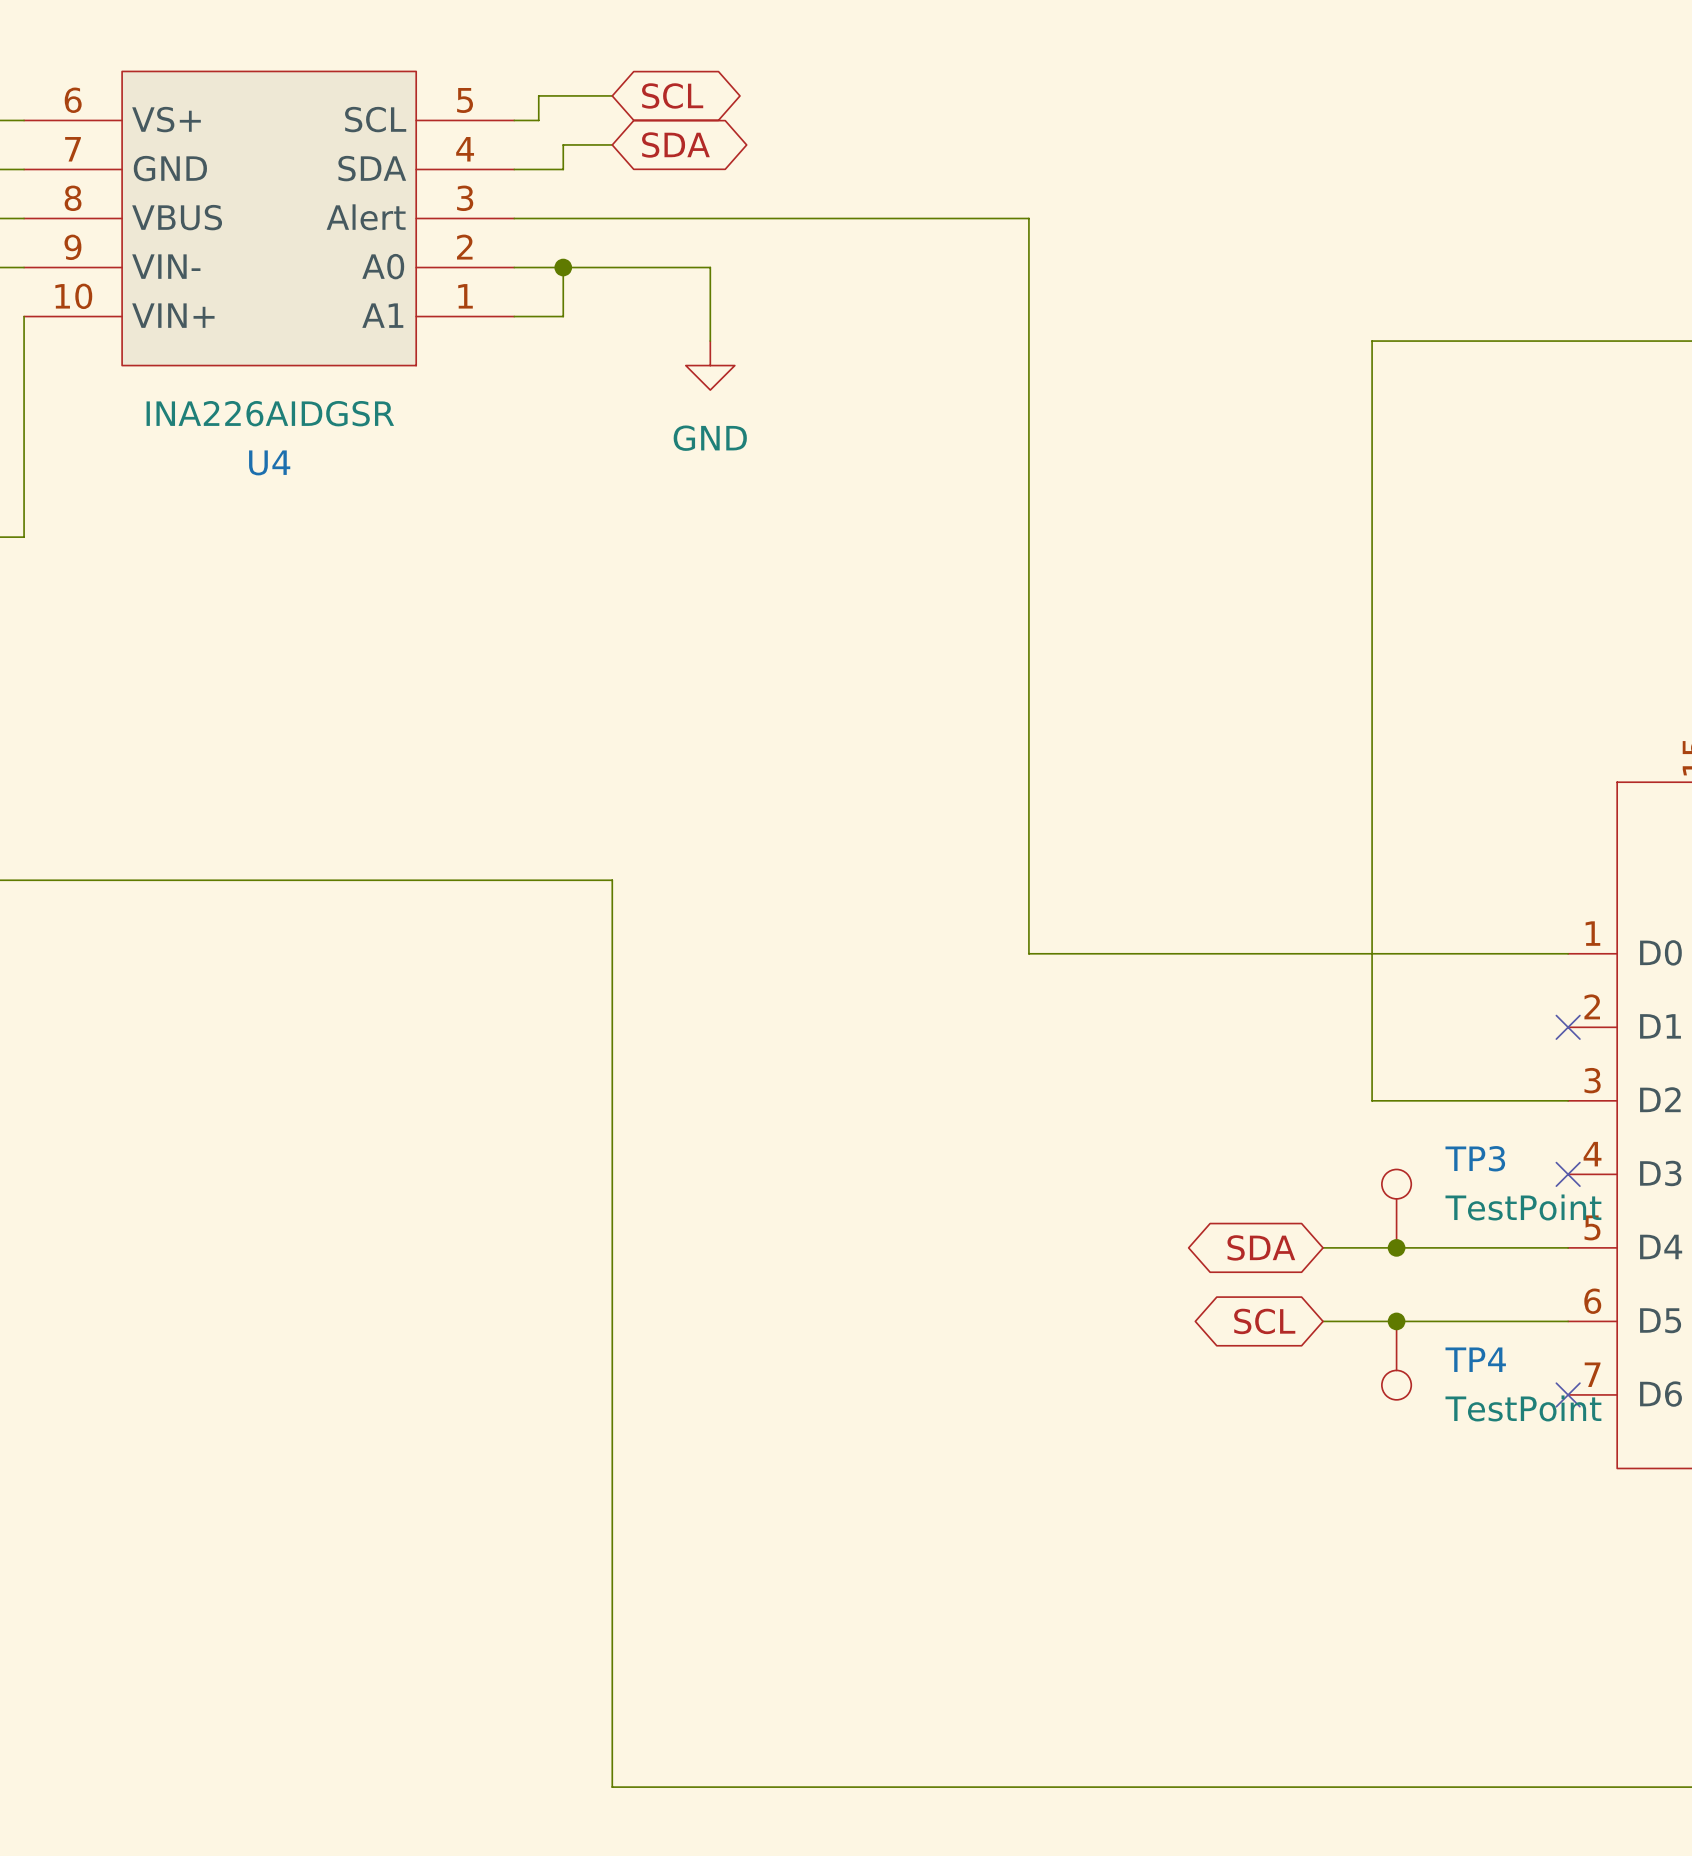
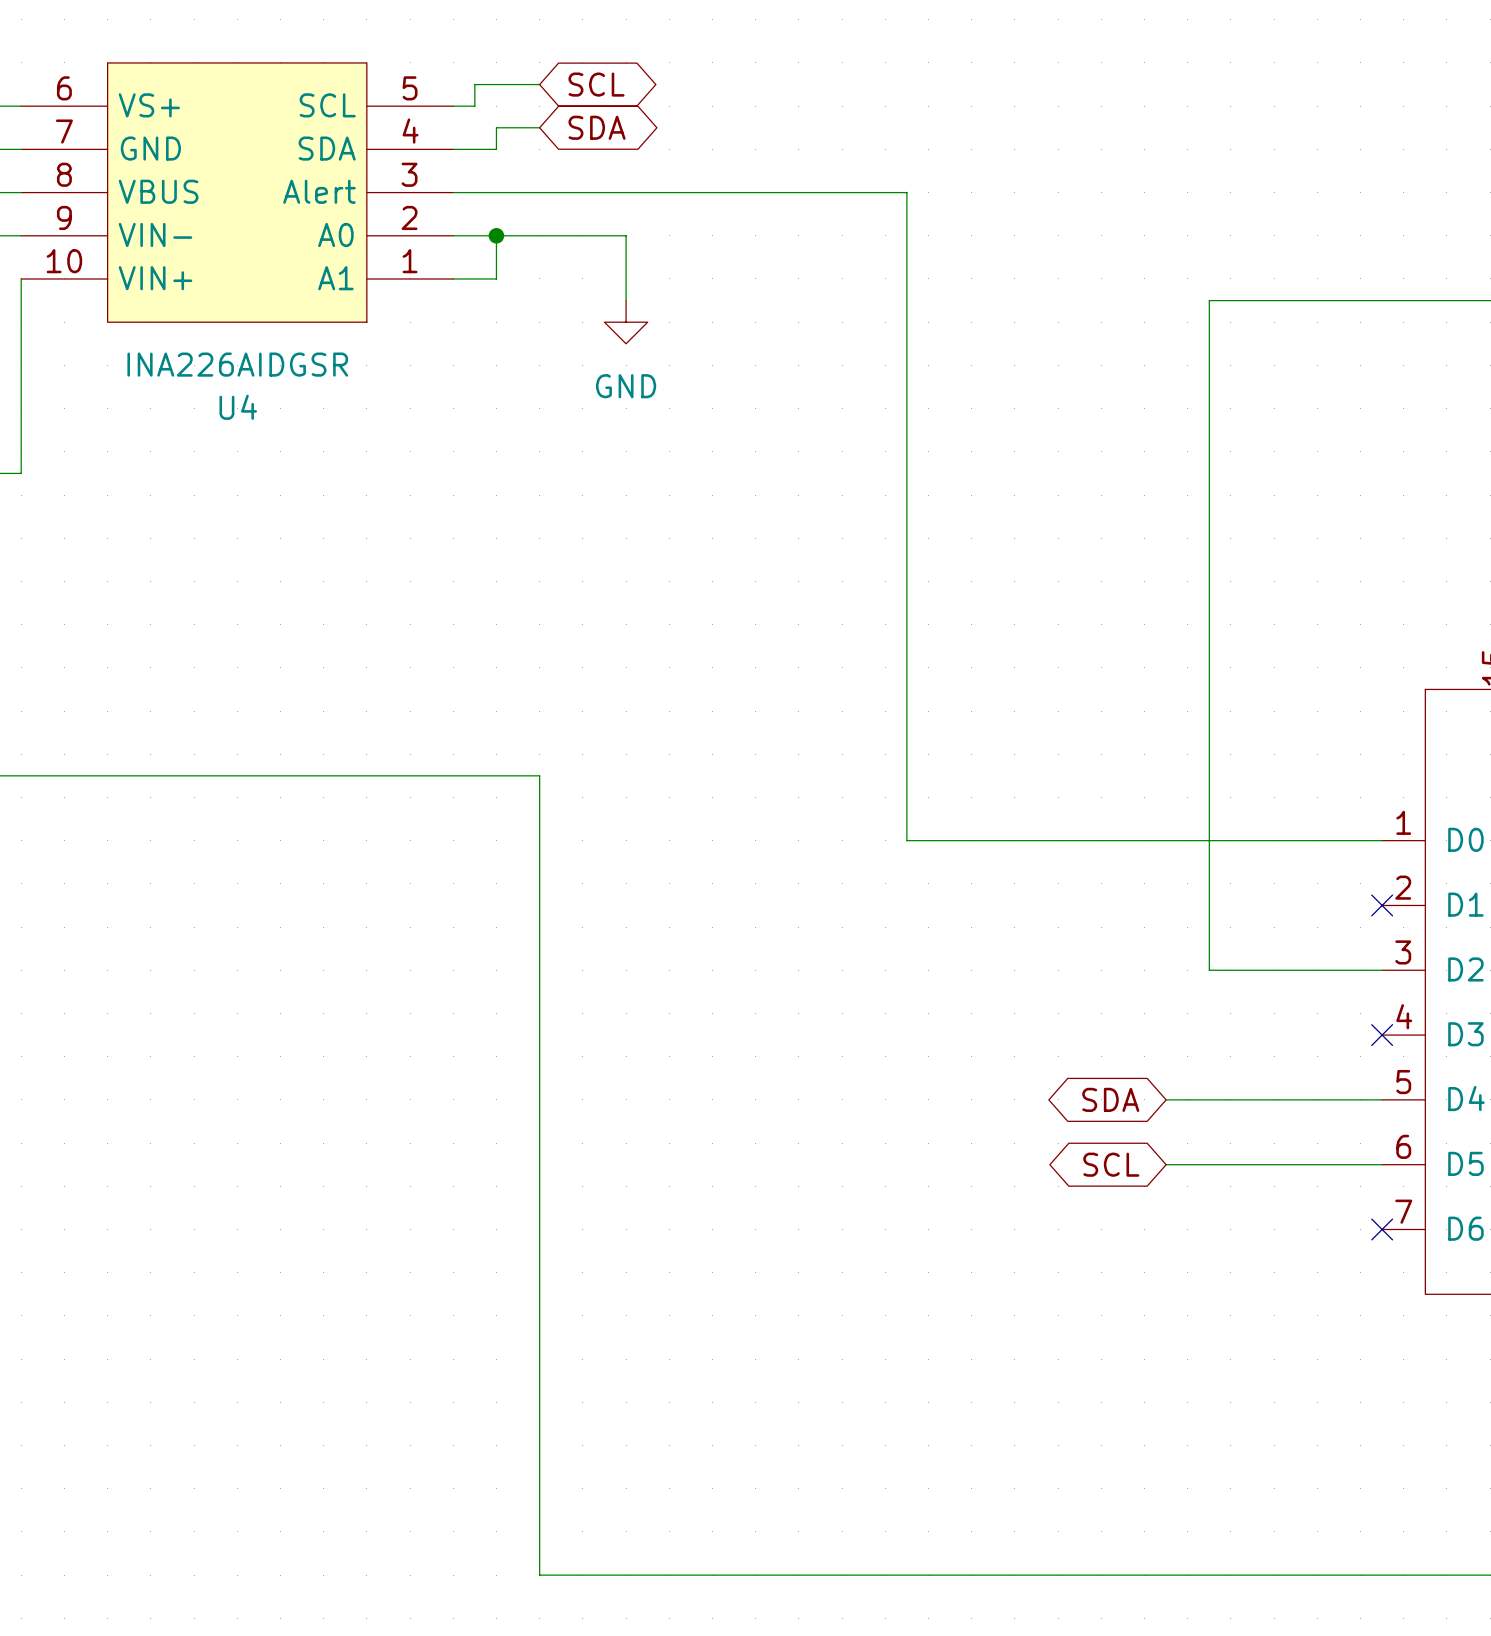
TP3: TestPoint (1396, 1208) -> none
junction: (1396, 1247) -> none
junction: (1396, 1321) -> none
TP4: TestPoint (1396, 1360) -> none

